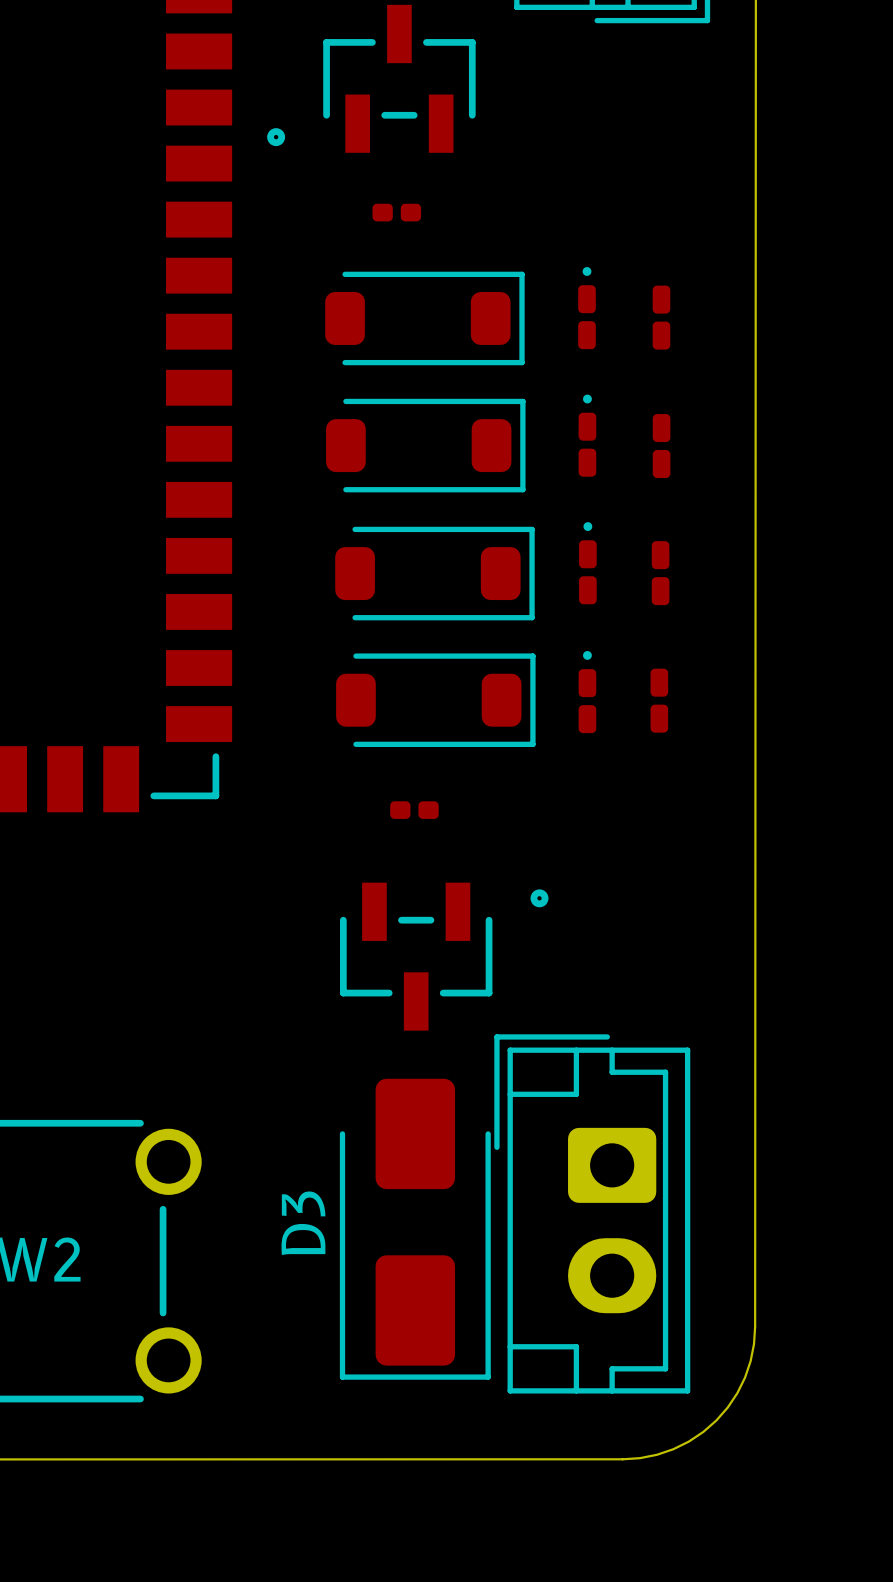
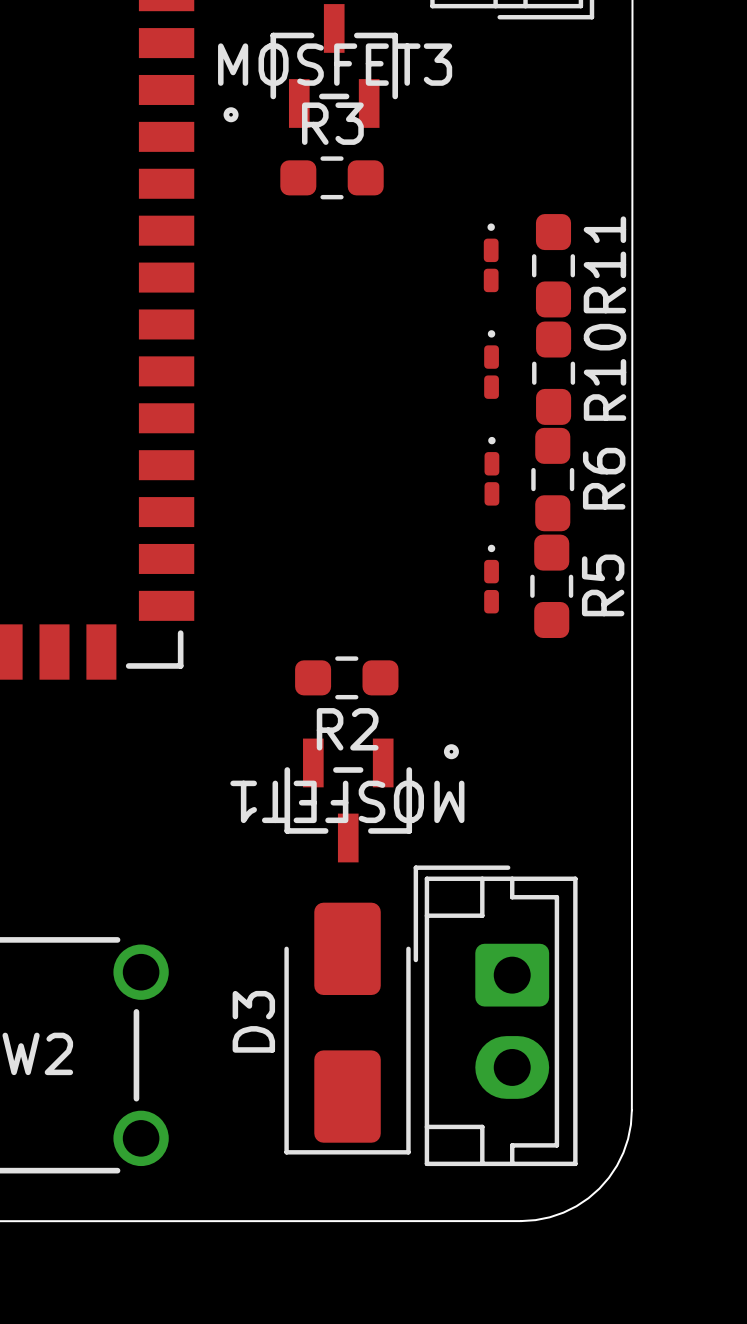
MOSFET3 name: none -> MOSFET3 (335, 64)
part: (396, 212) -> none
R3: none -> (332, 177)
part: (661, 317) -> none
R11: none -> (553, 265)
part: (424, 318) -> none
part: (425, 445) -> none
part: (661, 446) -> none
R10: none -> (553, 373)
part: (434, 573) -> none
part: (660, 573) -> none
R6: none -> (552, 479)
part: (435, 700) -> none
part: (659, 700) -> none
R5: none -> (551, 586)
part: (414, 810) -> none
R2: none -> (346, 677)
MOSFET1 name: none -> MOSFET1 (347, 801)

